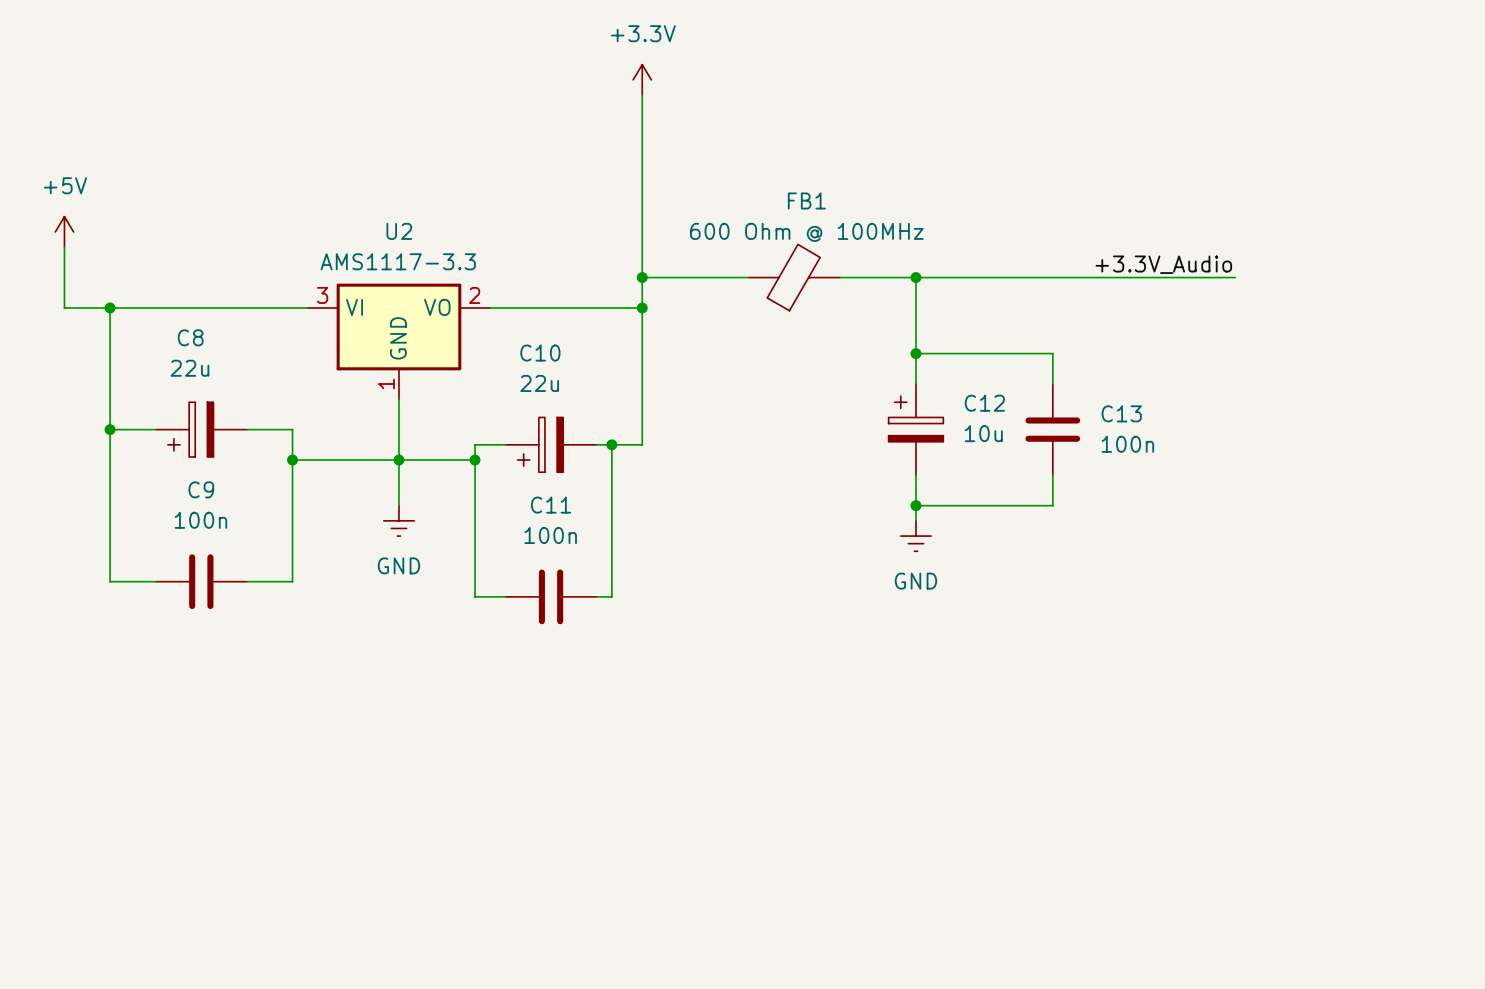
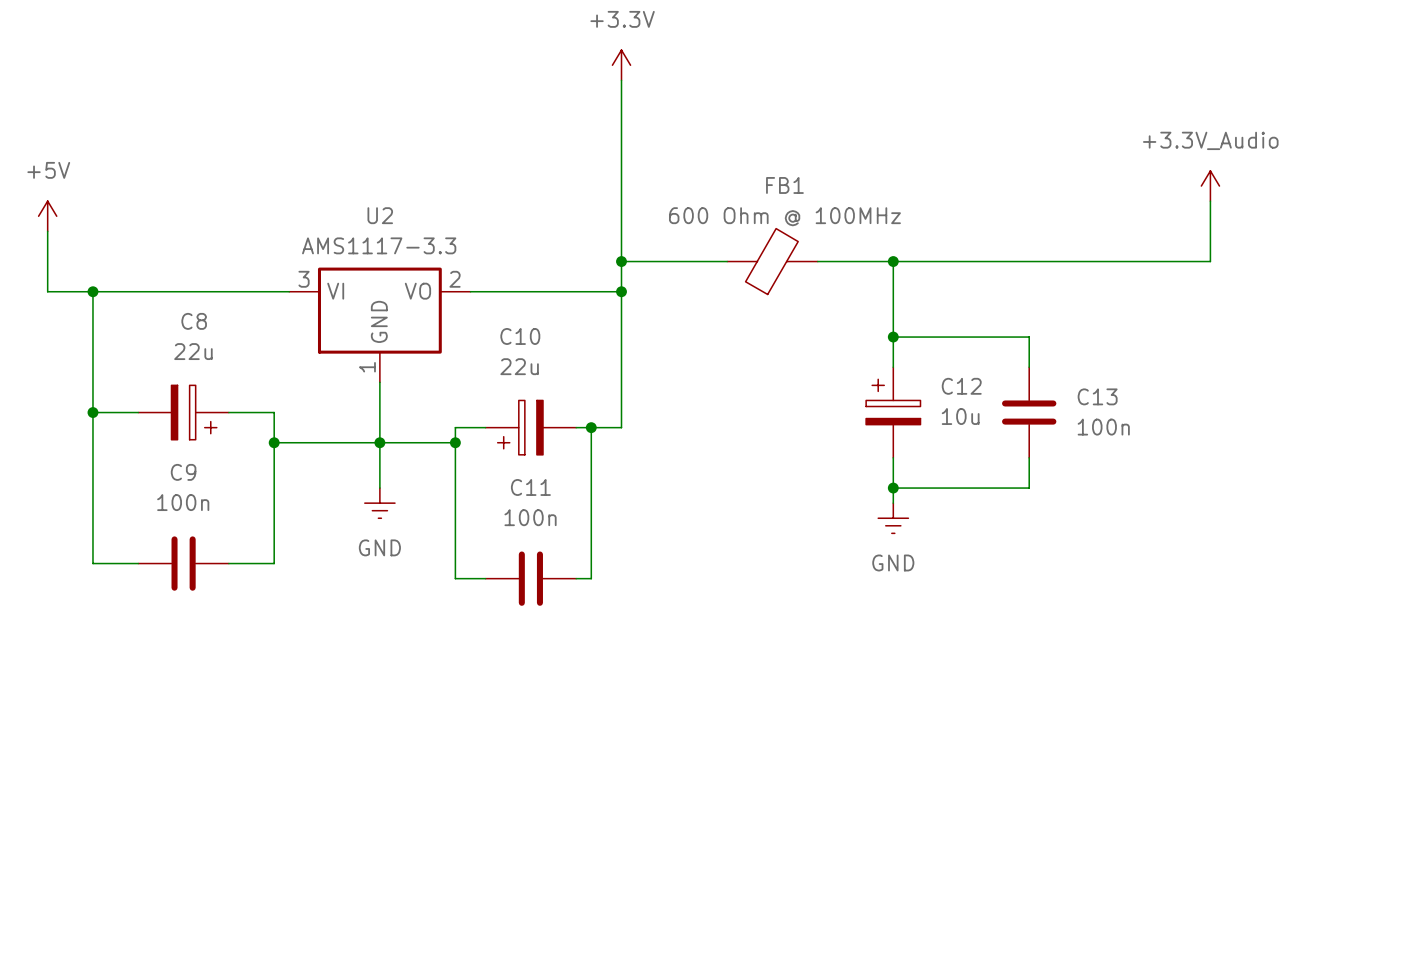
power symbol: none -> +3.3V_Audio (1210, 186)
wire: none -> (1210, 201) (1210, 261)
label: +3.3V_Audio (1163, 264) -> none
C8 flip: as is (190, 429) -> left-right (194, 412)

